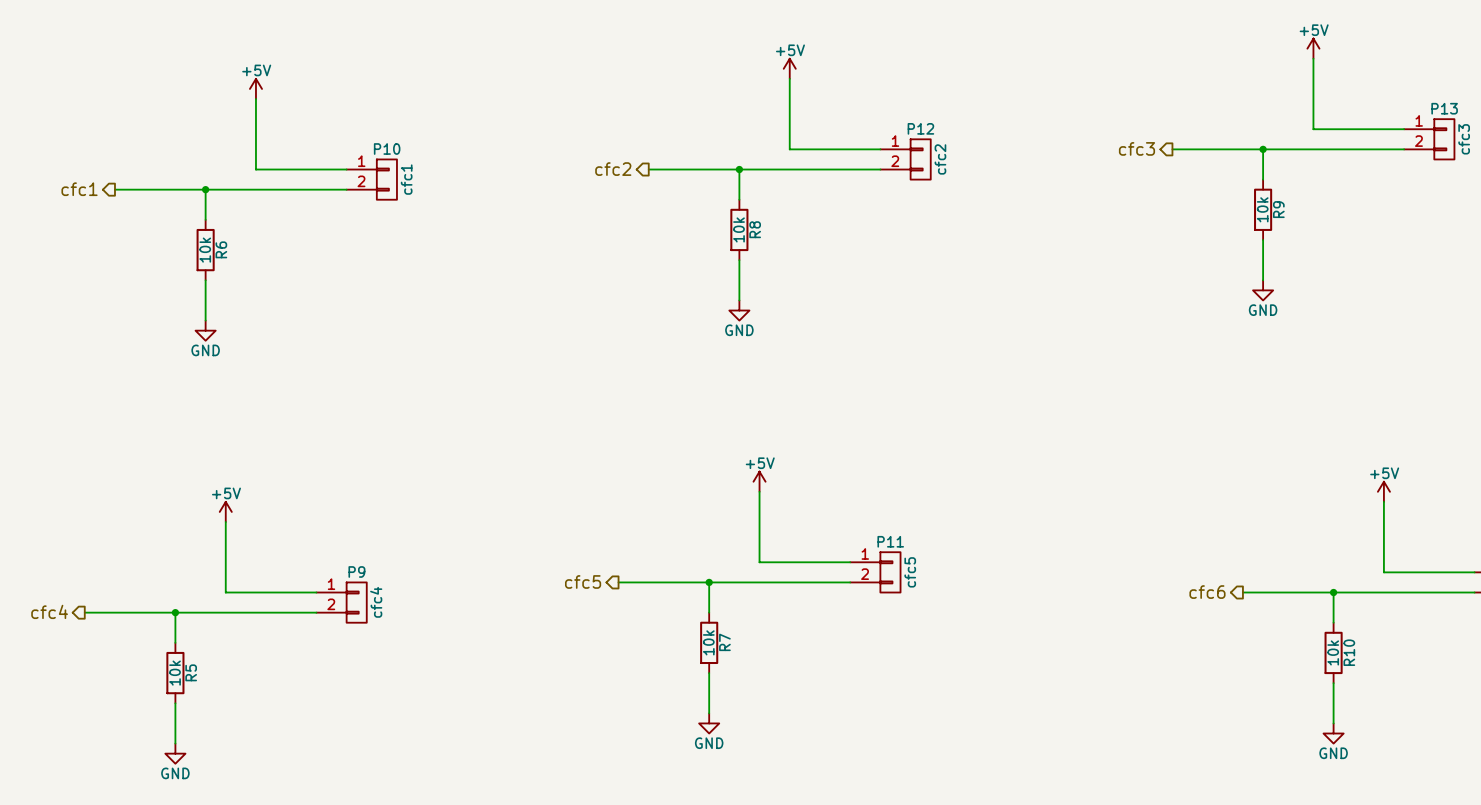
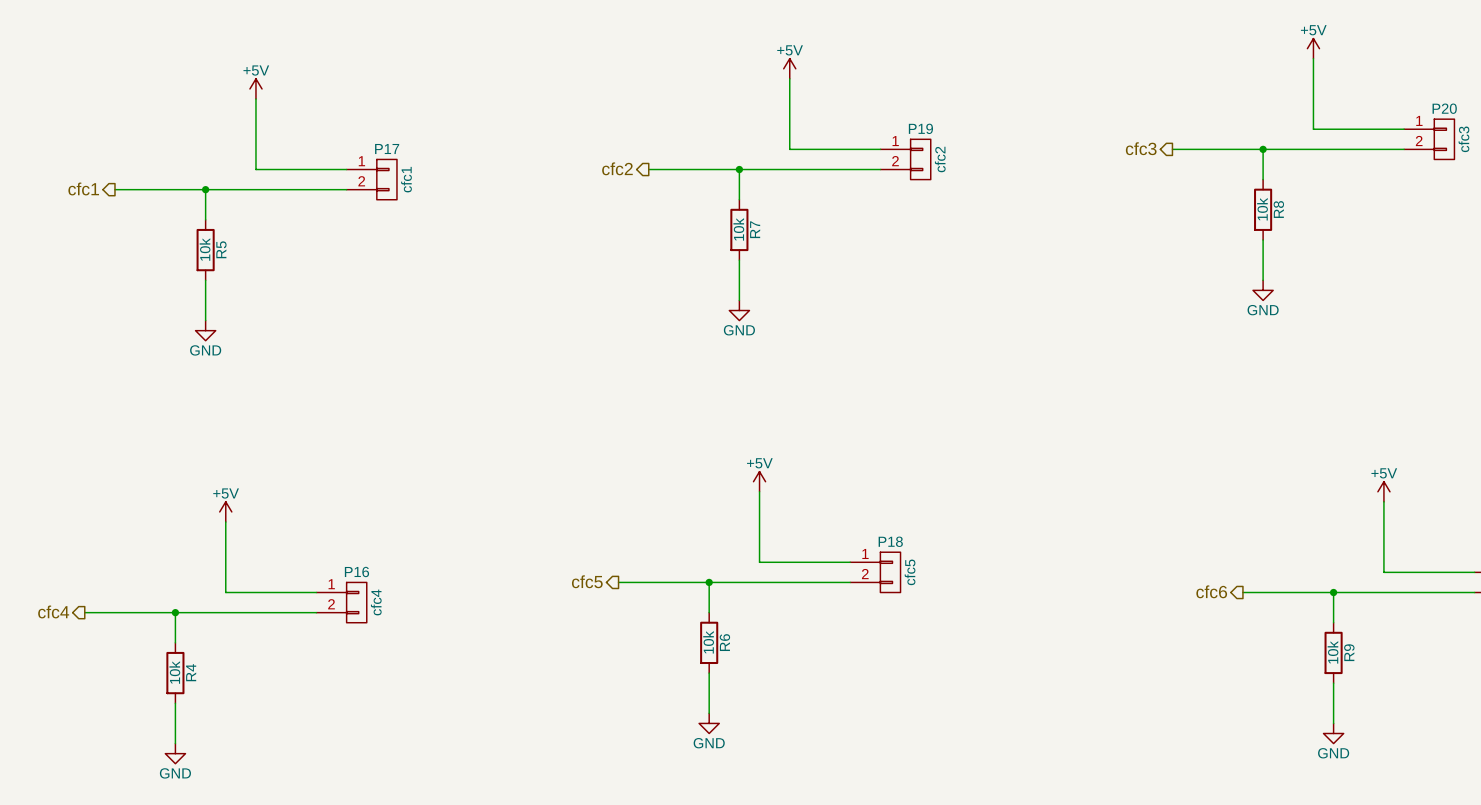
P13 name: P13 (1444, 108) -> P20 (1444, 108)
P12 name: P12 (920, 128) -> P19 (920, 128)
P10 name: P10 (387, 149) -> P17 (387, 149)
R9 name: R9 (1278, 209) -> R8 (1278, 209)
R8 name: R8 (755, 229) -> R7 (755, 229)
R6 name: R6 (221, 249) -> R5 (221, 249)
P11 name: P11 (890, 541) -> P18 (890, 541)
P9 name: P9 (356, 571) -> P16 (356, 571)
R7 name: R7 (724, 642) -> R6 (724, 642)
R10 name: R10 (1349, 652) -> R9 (1349, 652)
R5 name: R5 (191, 672) -> R4 (191, 672)

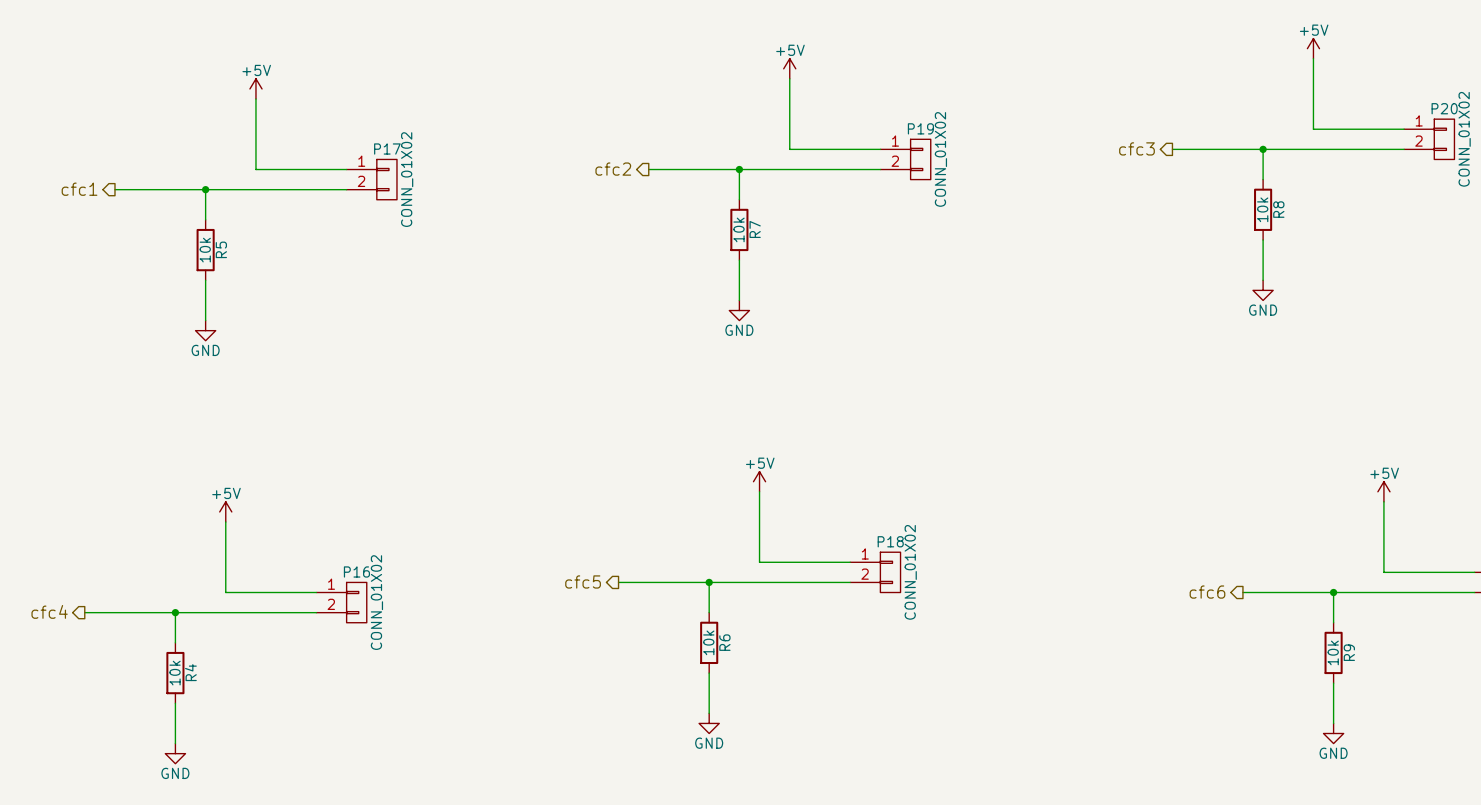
P20 value: cfc3 (1463, 139) -> CONN_01X02 (1464, 139)
P19 value: cfc2 (940, 159) -> CONN_01X02 (940, 159)
P17 value: cfc1 (406, 179) -> CONN_01X02 (407, 179)
P18 value: cfc5 (910, 572) -> CONN_01X02 (910, 572)
P16 value: cfc4 (376, 602) -> CONN_01X02 (376, 602)

